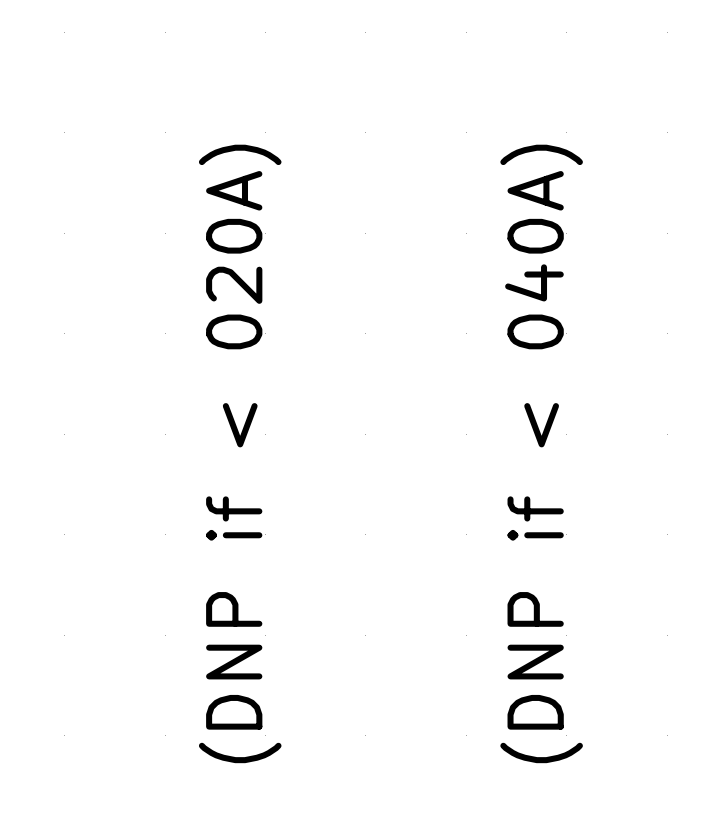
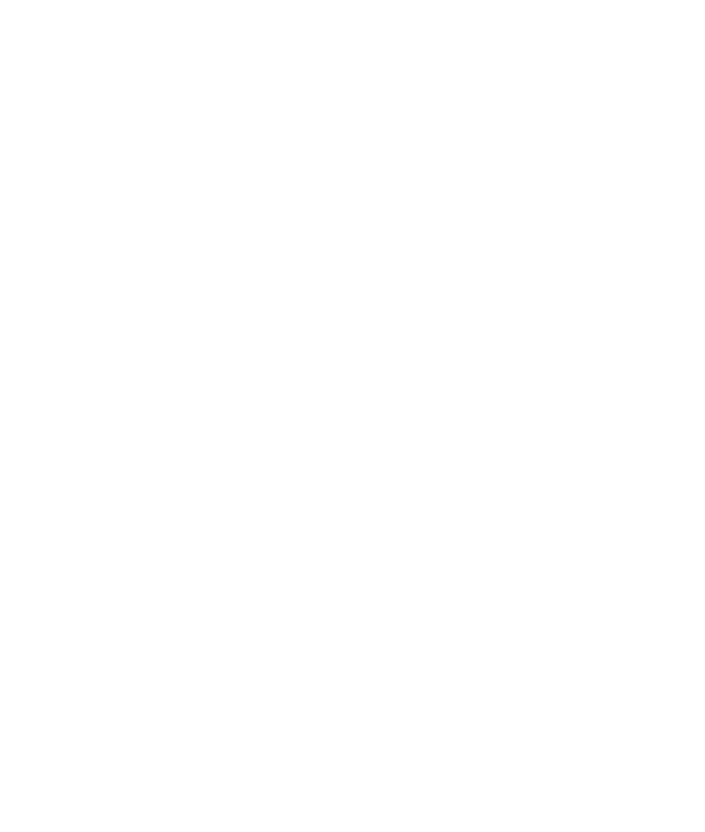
text: (DNP if < 020A) (240, 453) -> none
text: (DNP if < 040A) (541, 453) -> none

